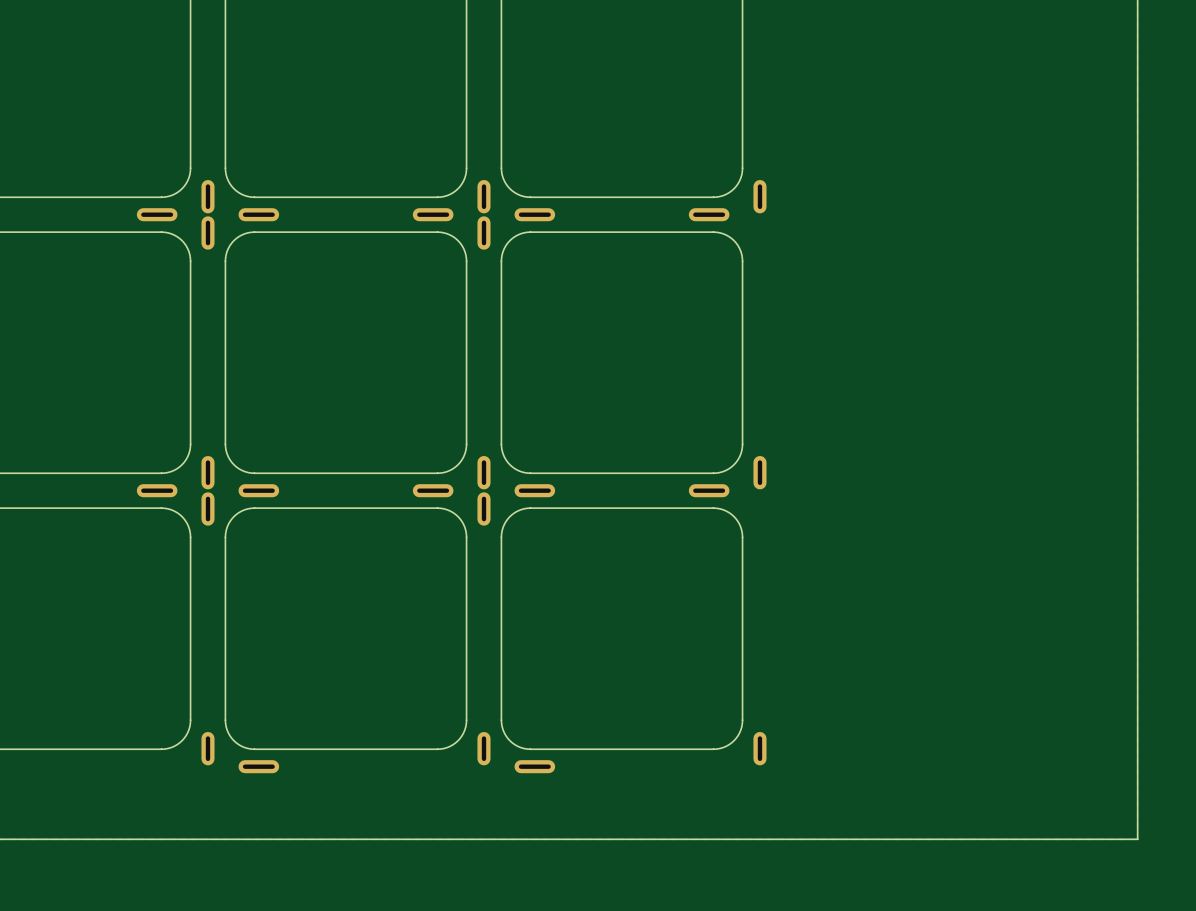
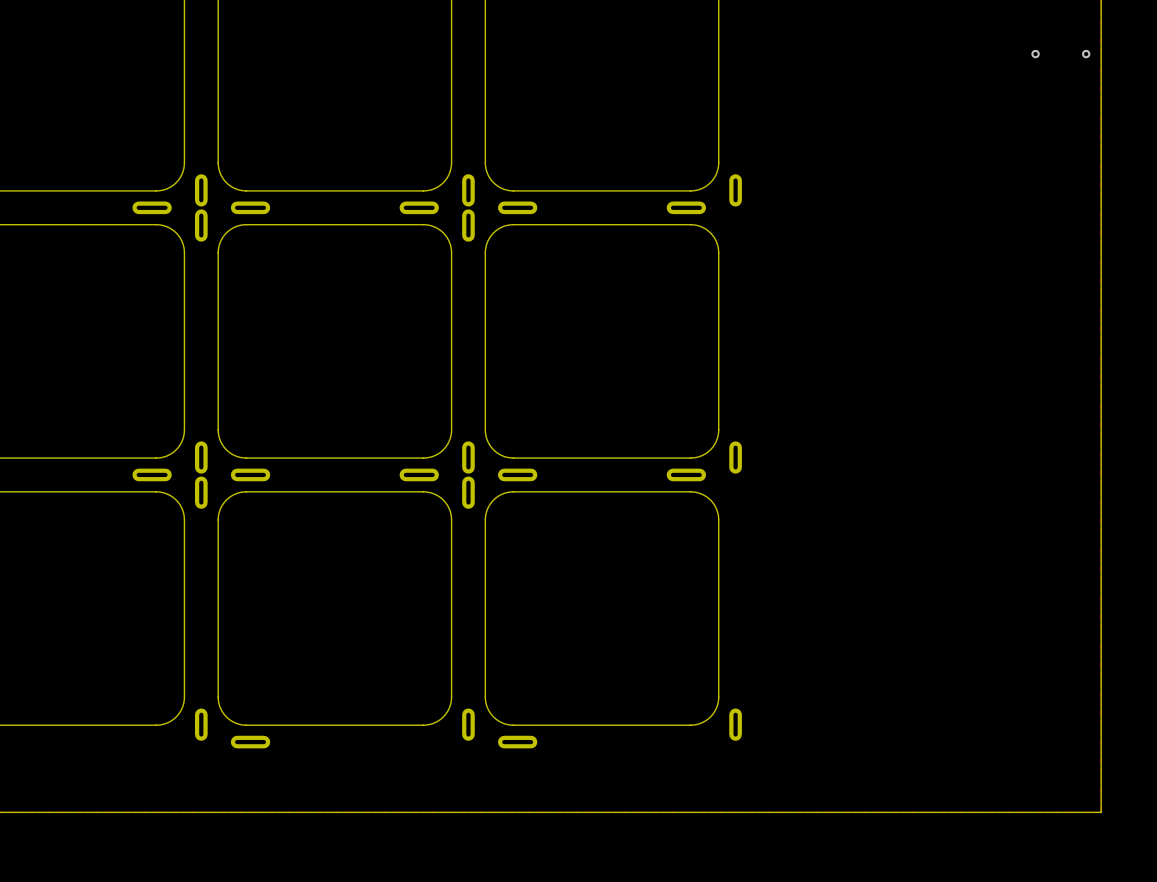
via: none -> (1035, 54)
via: none -> (1086, 54)

